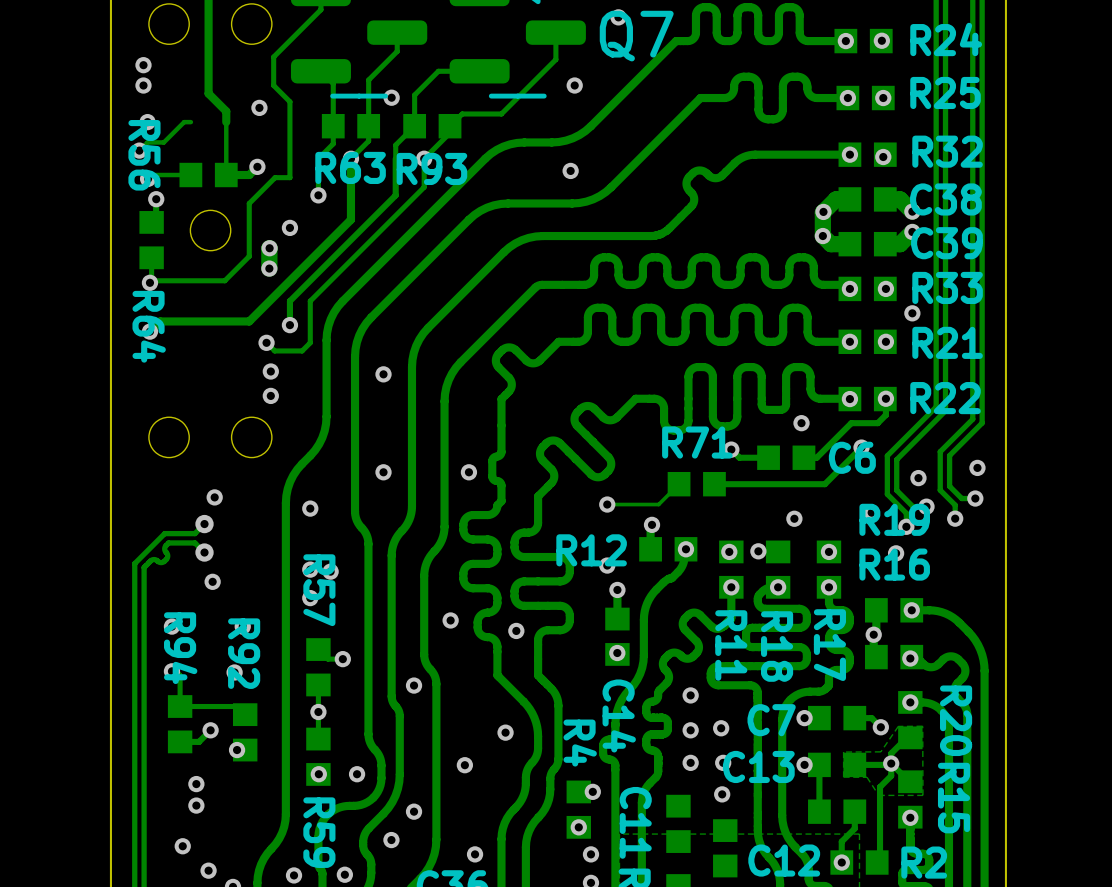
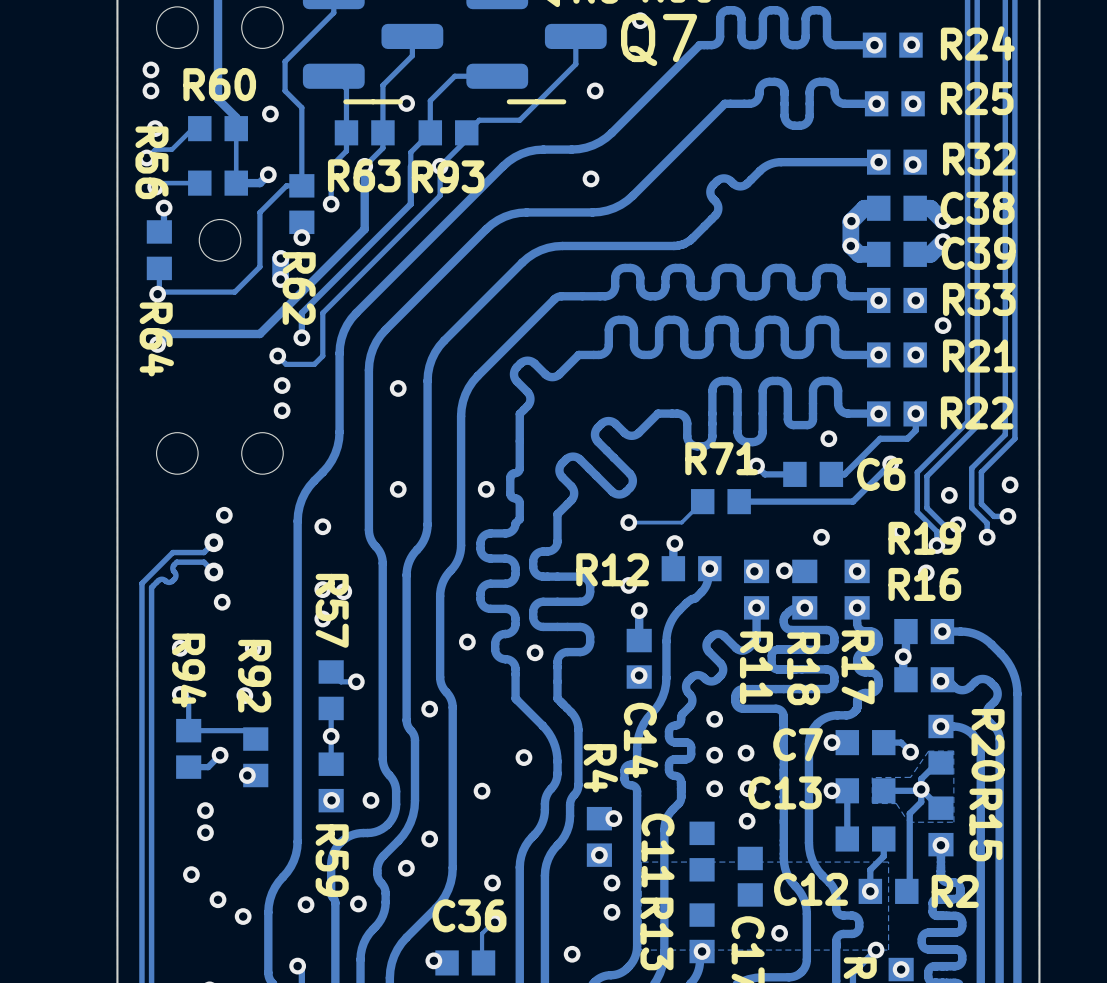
R60: none -> (218, 128)
R62: none -> (301, 204)

